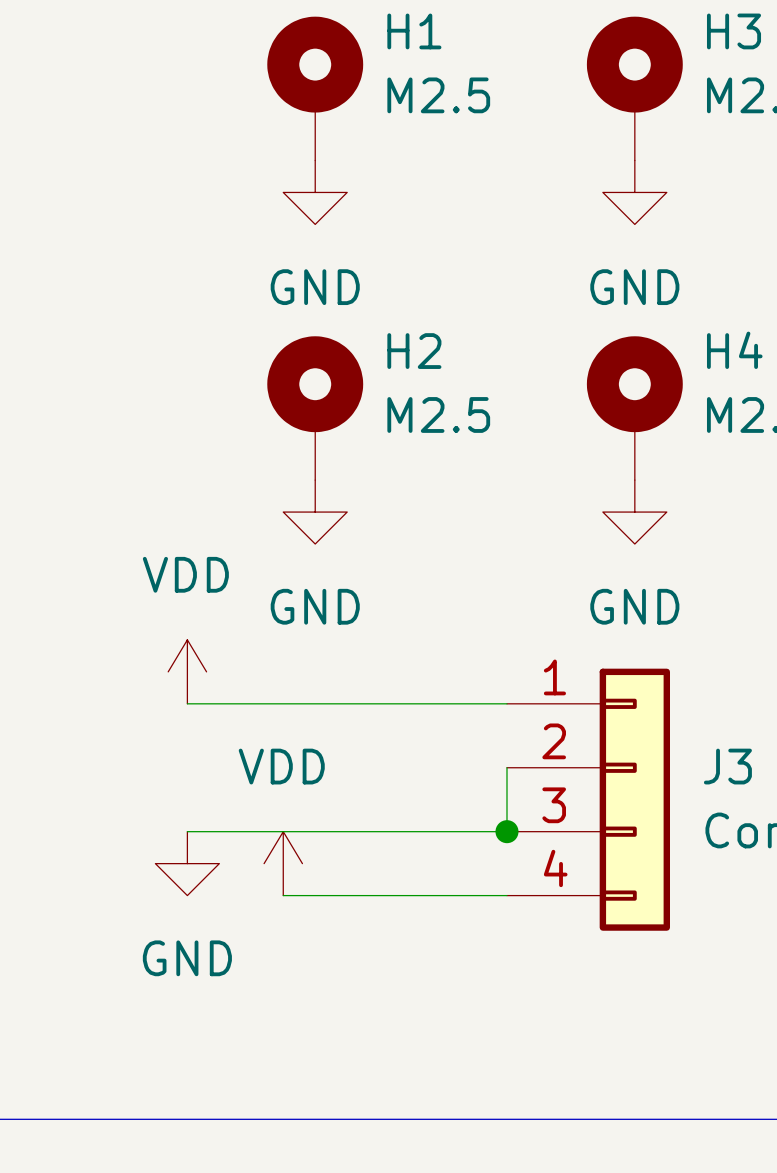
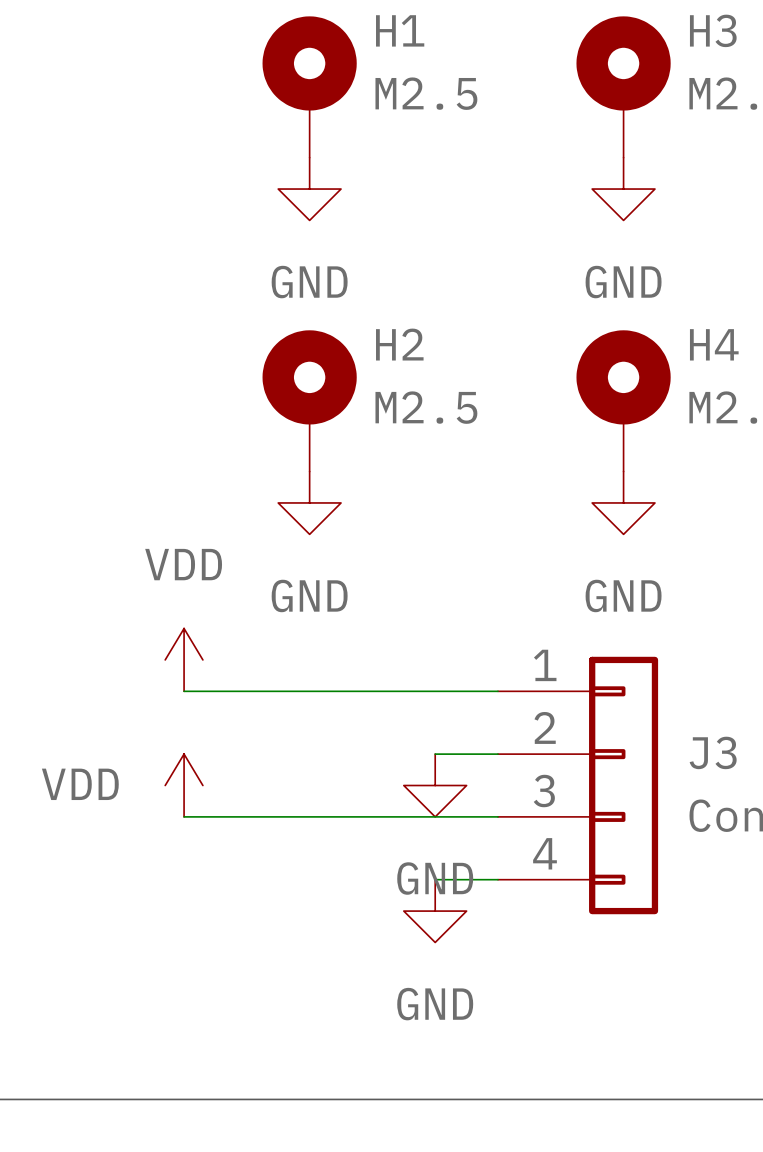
power symbol text position: VDD (281, 766) -> VDD (80, 784)
wire: (506, 767) (506, 831) -> (497, 754) (435, 754)
power symbol: none -> GND (435, 785)
junction: (506, 831) -> none
power symbol: GND (187, 863) -> none
power symbol position: VDD (283, 863) -> VDD (184, 785)
wire: (283, 895) (443, 895) -> none
power symbol: none -> GND (435, 911)

